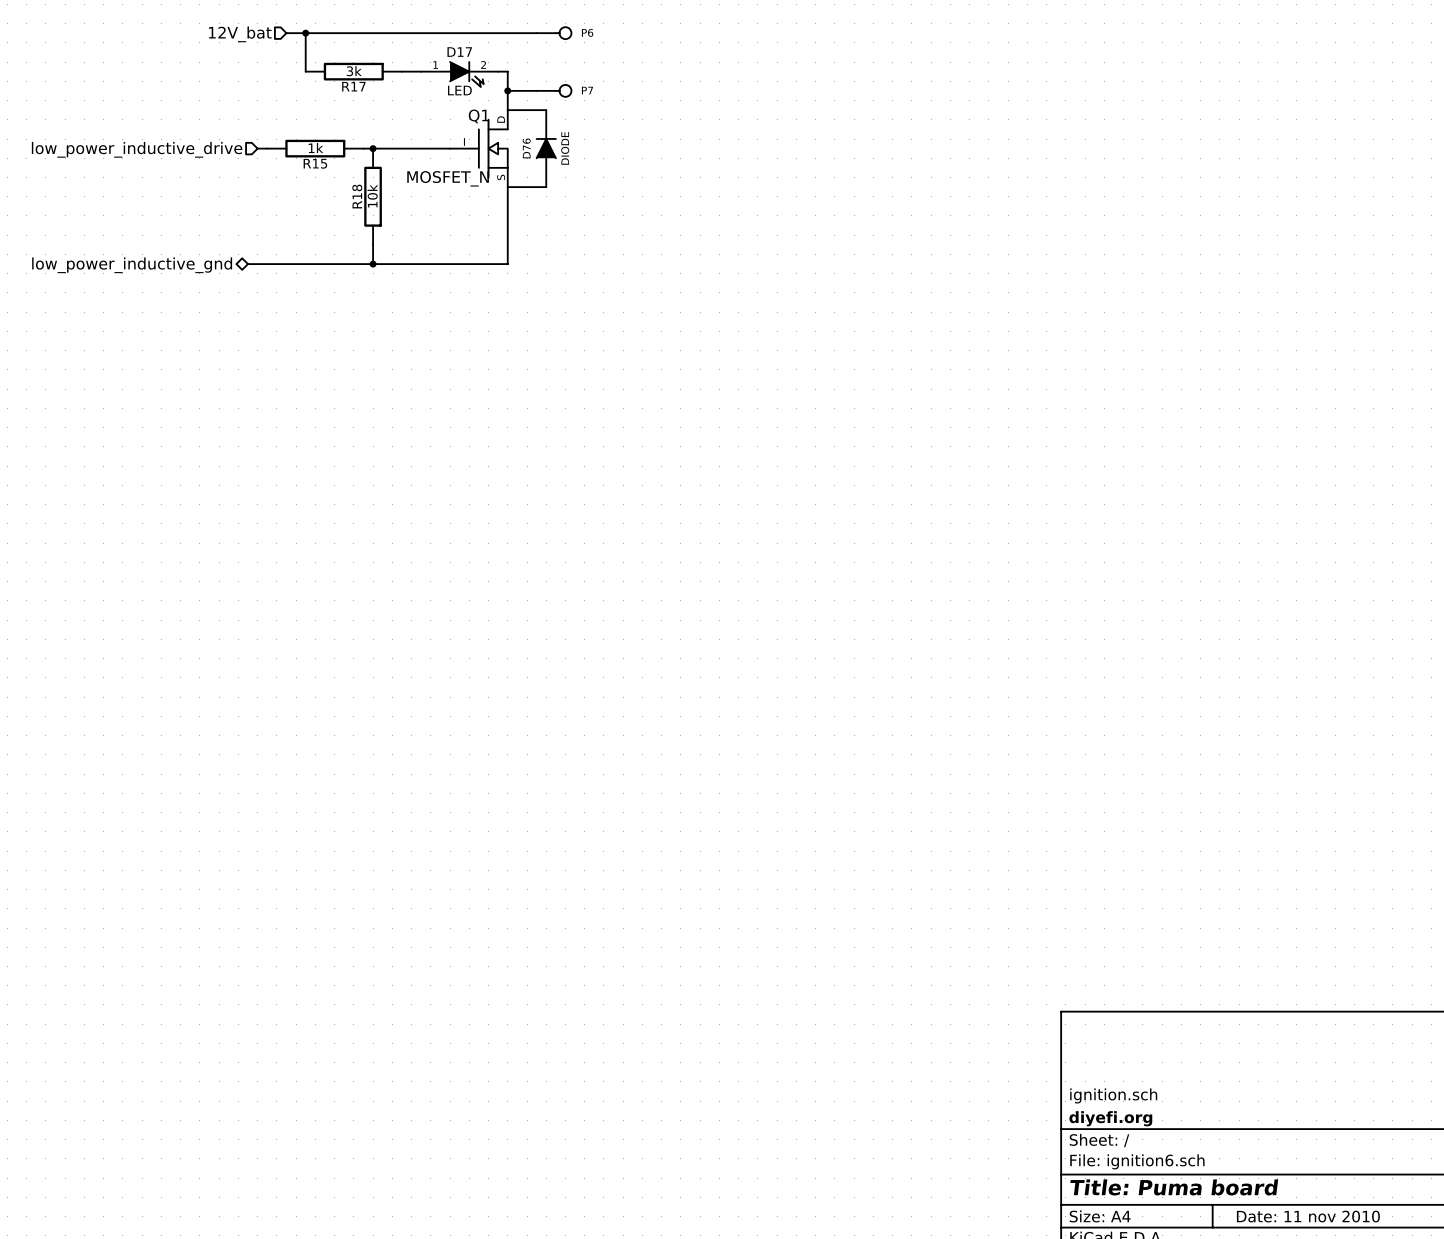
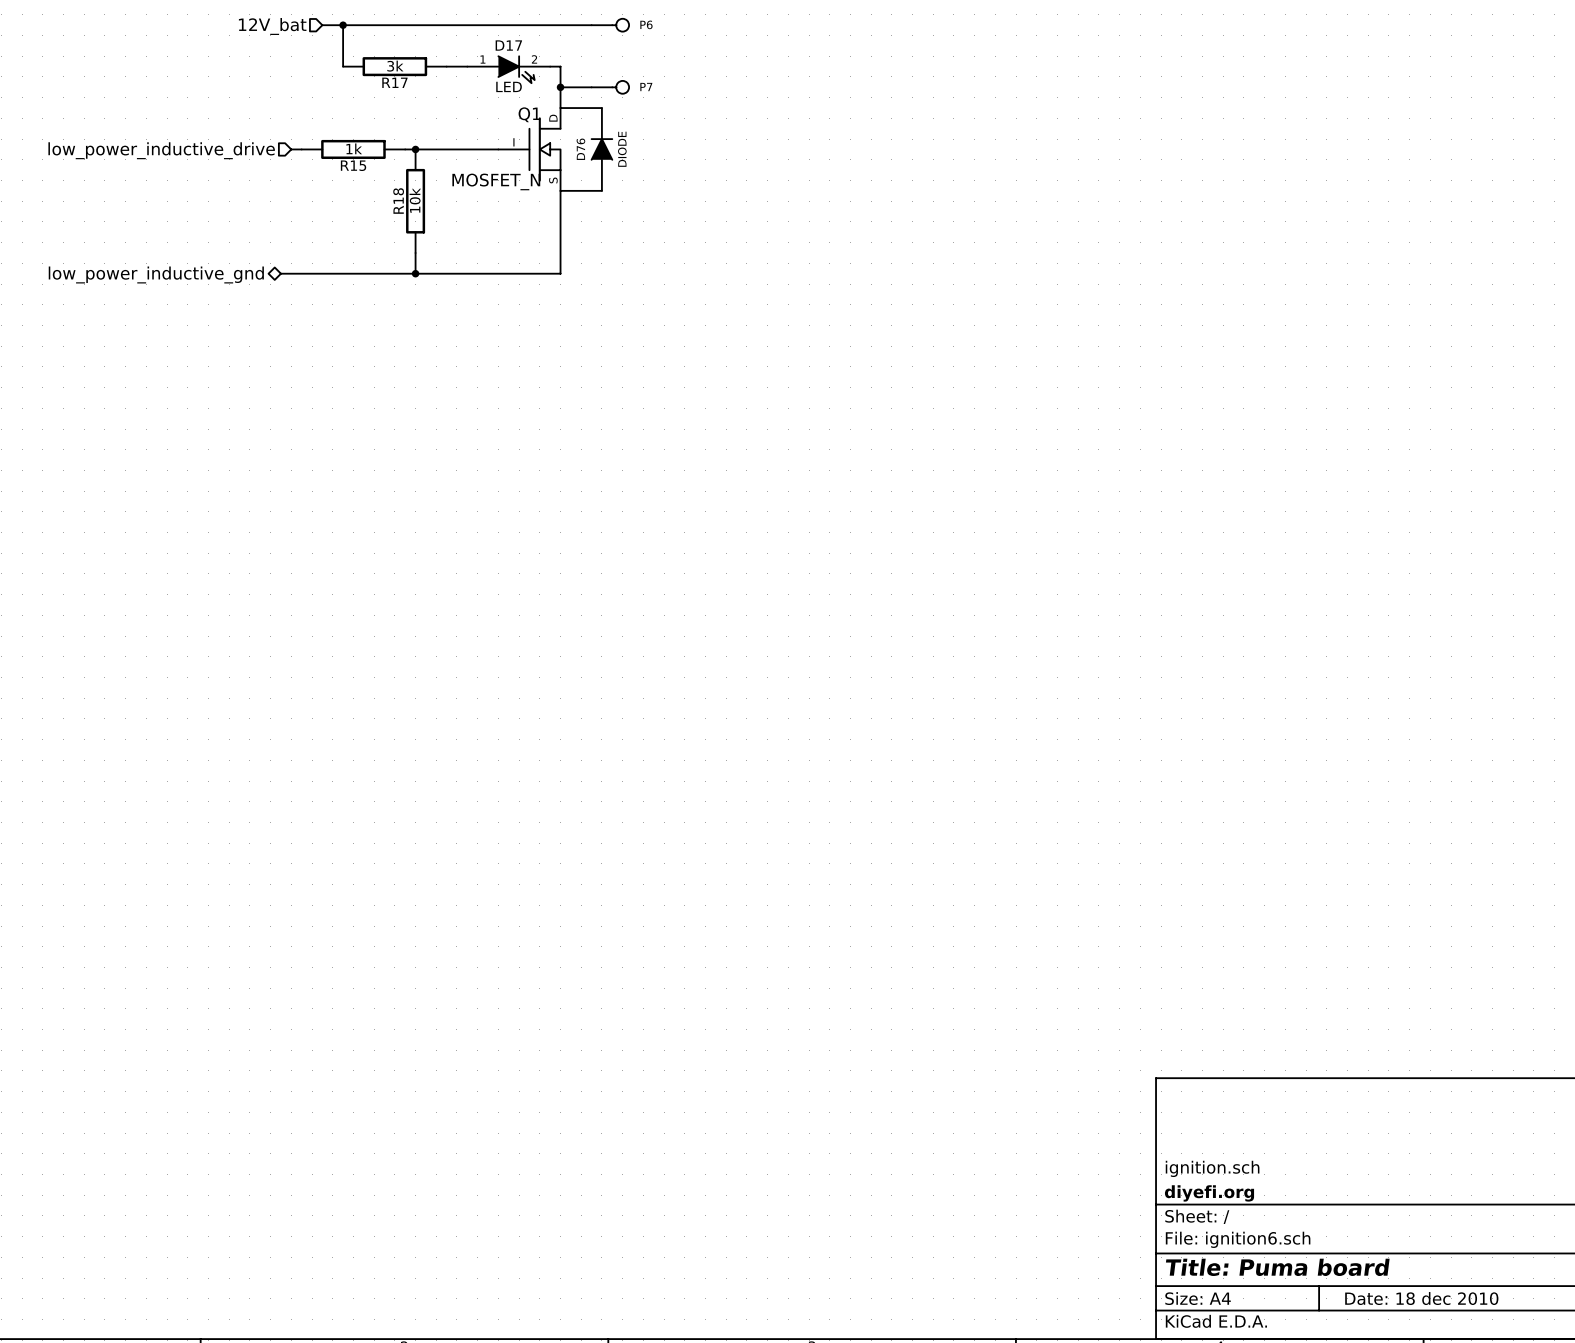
title block: Date: 11 nov 2010 (1308, 1216) -> Date: 18 dec 2010 (1421, 1298)

